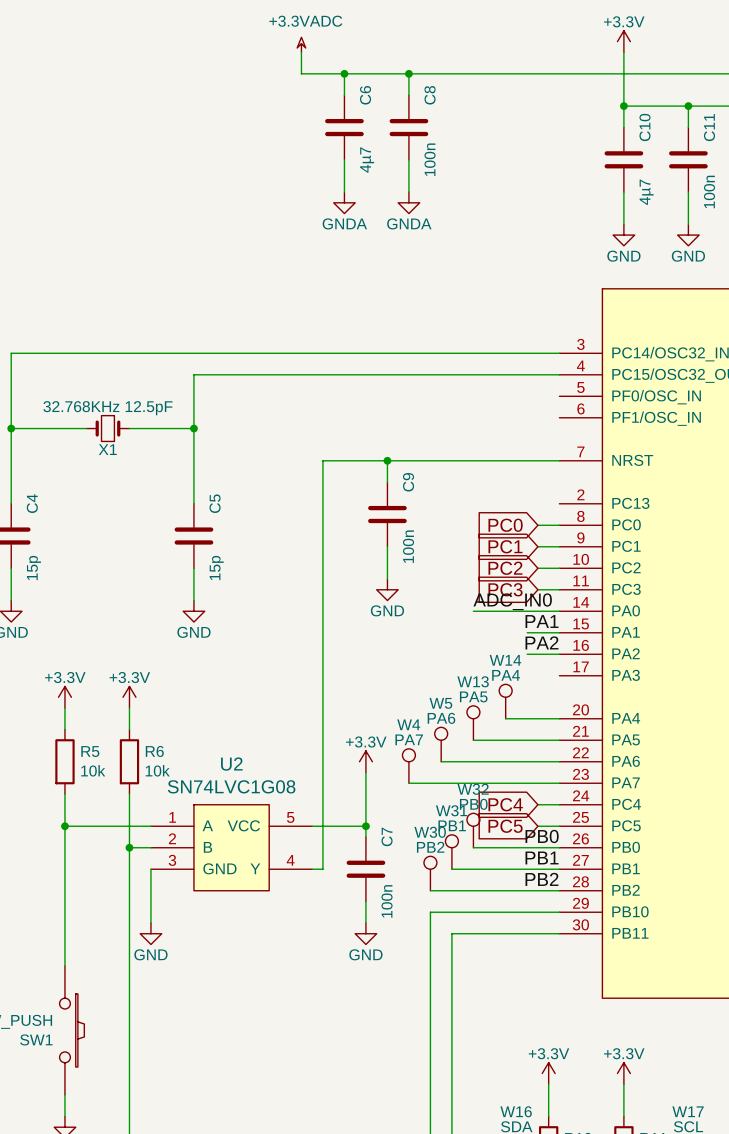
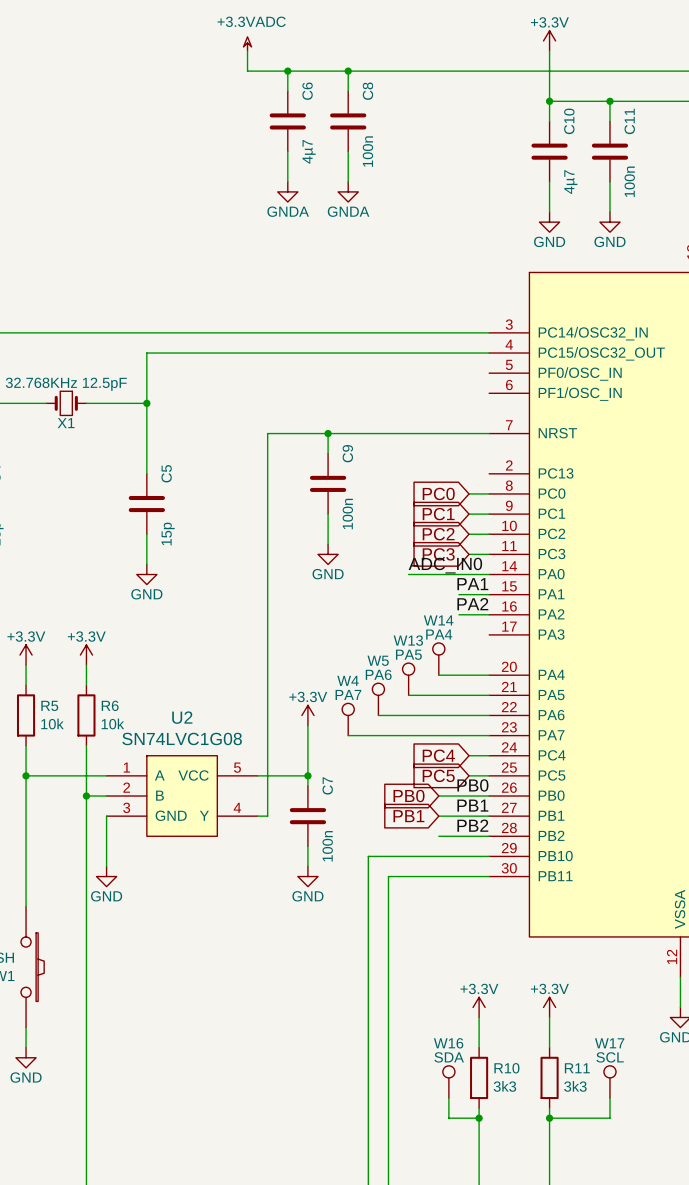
W32: PB0 (473, 830) -> none
wire: (473, 847) (505, 847) -> none
global label: none -> PB0 (409, 796)
W31: PB1 (451, 852) -> none
wire: (451, 869) (505, 869) -> none
global label: none -> PB1 (408, 816)
W30: PB2 (430, 873) -> none
wire: (430, 890) (505, 890) -> none

